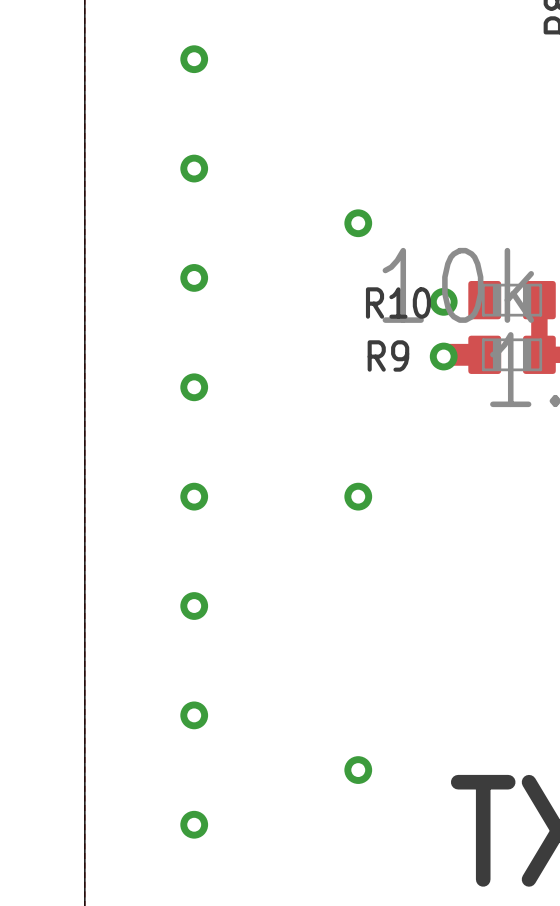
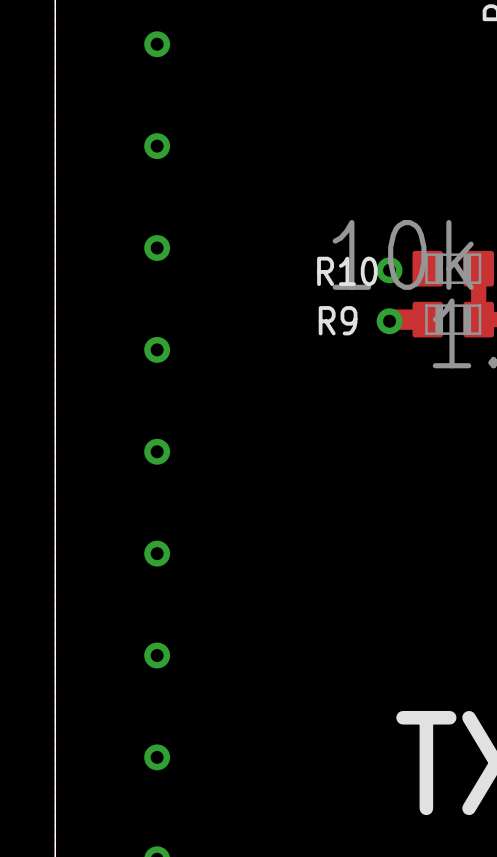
via: (358, 223) -> none
via: (358, 496) -> none
via: (358, 770) -> none

